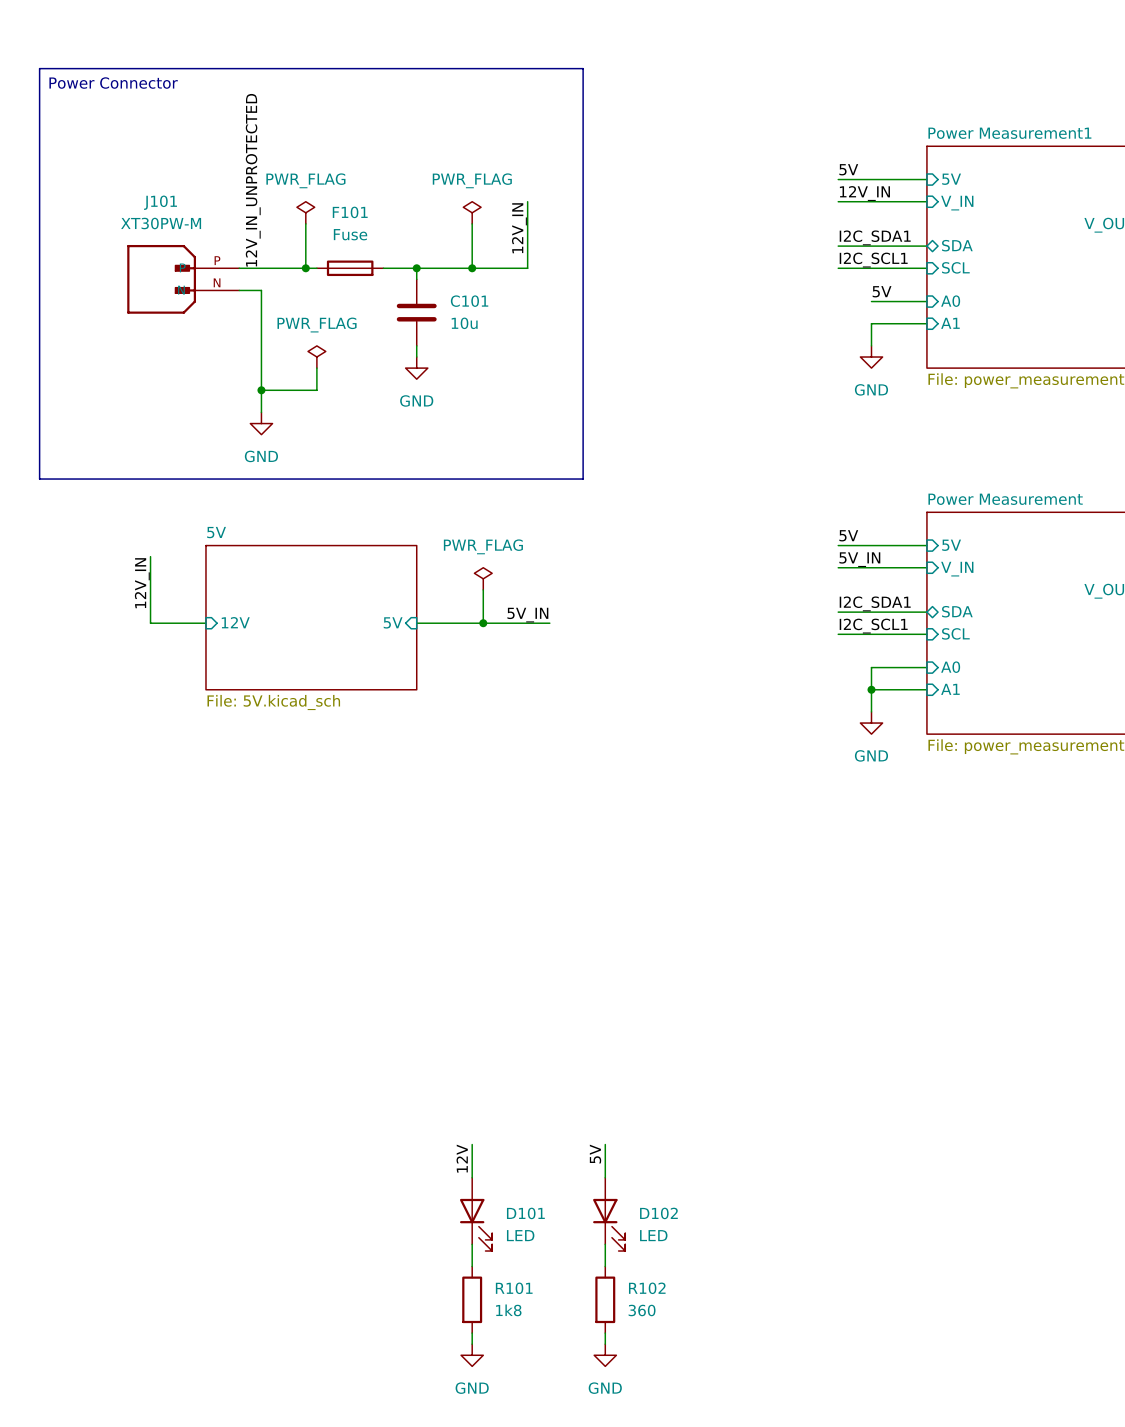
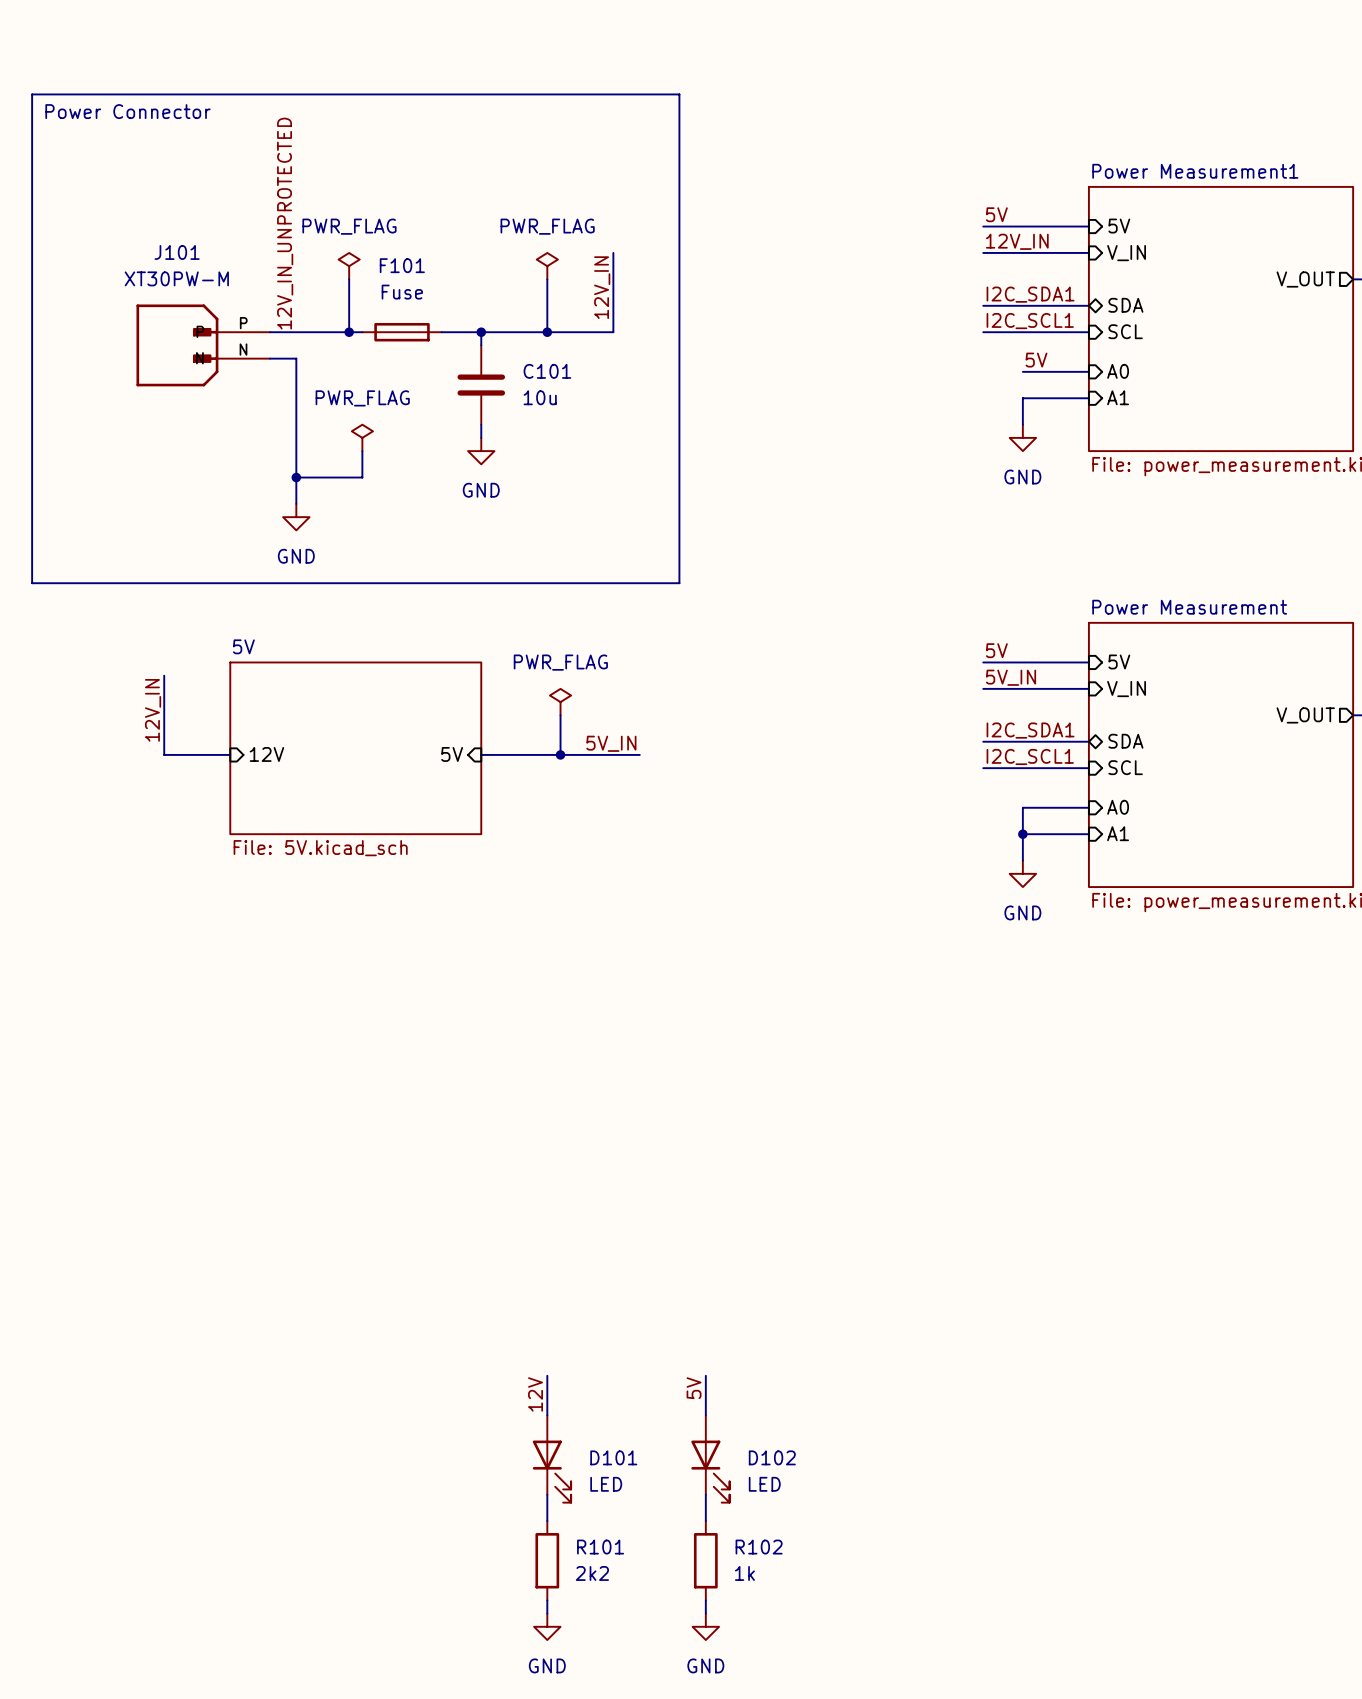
R101 value: 1k8 (508, 1310) -> 2k2 (592, 1573)
R102 value: 360 (642, 1310) -> 1k (744, 1573)

